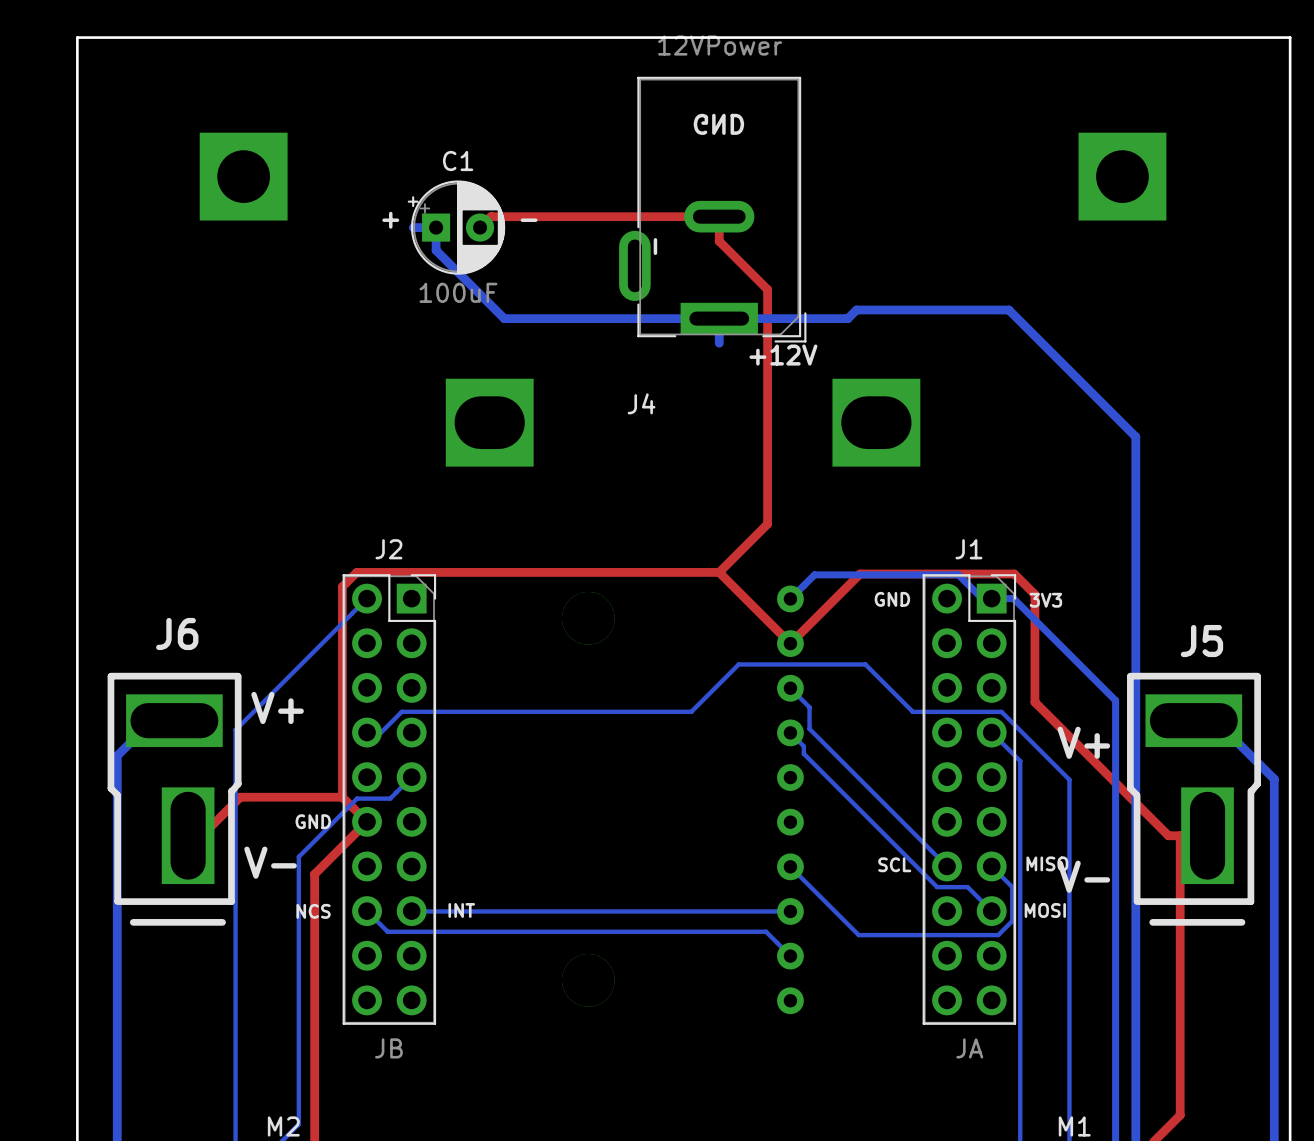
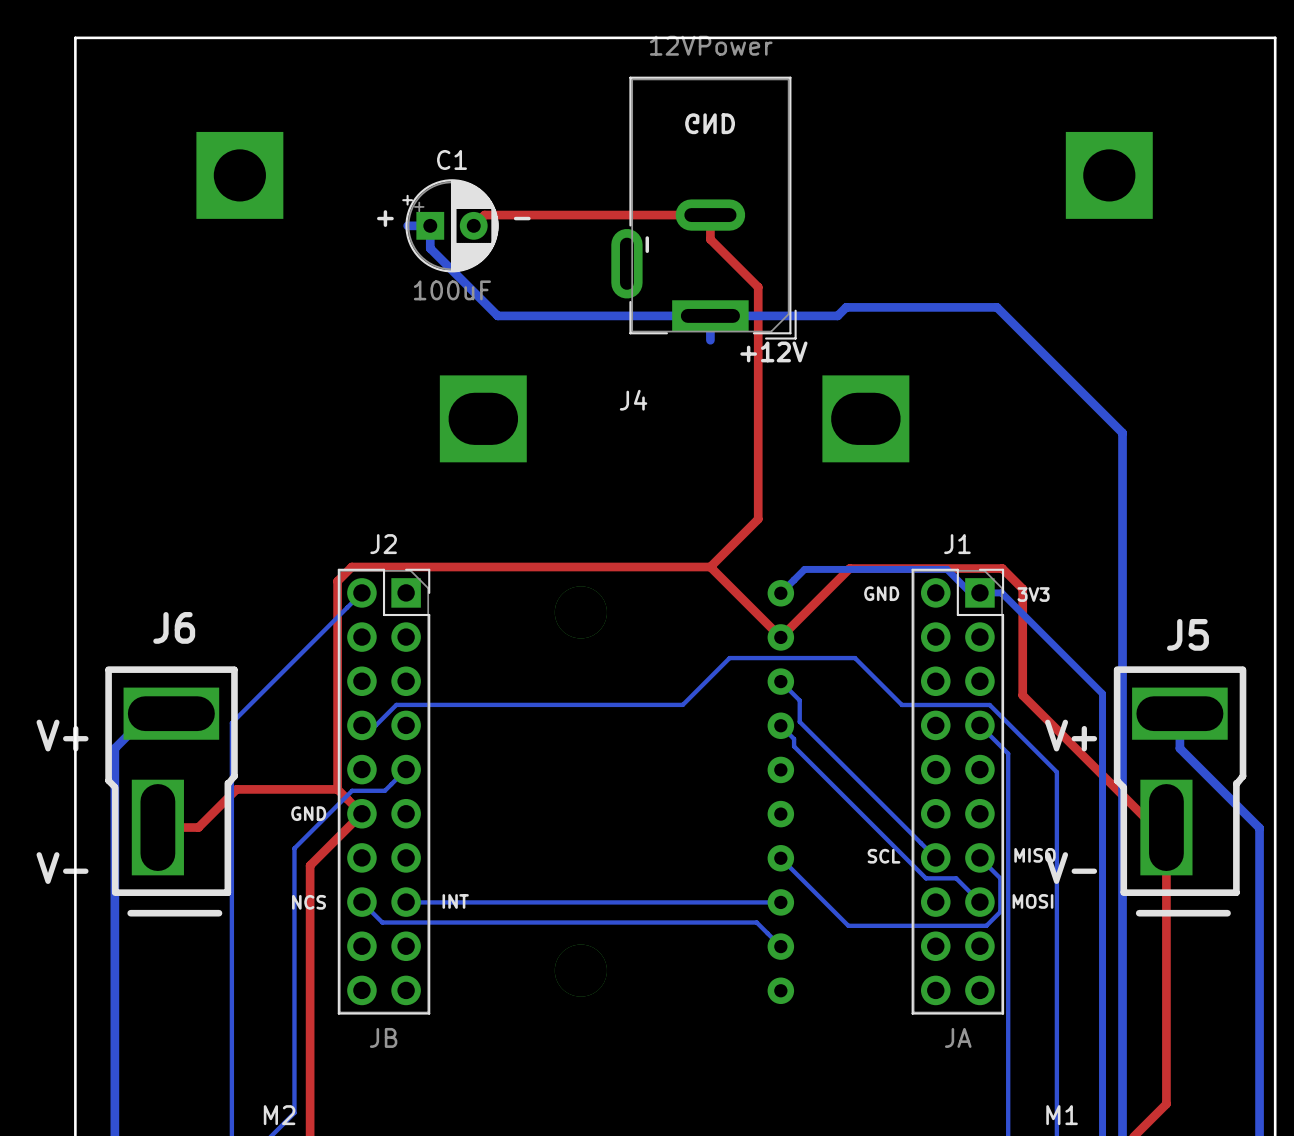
J6 footprint: [107, 672, 242, 926] -> [105, 666, 238, 917]
J5 footprint: [1127, 672, 1261, 926] -> [1113, 666, 1247, 917]
bottom track: (1193, 720) (1215, 720) (1274, 779) (1274, 836) -> (1179, 713) (1179, 748) (1259, 828)

